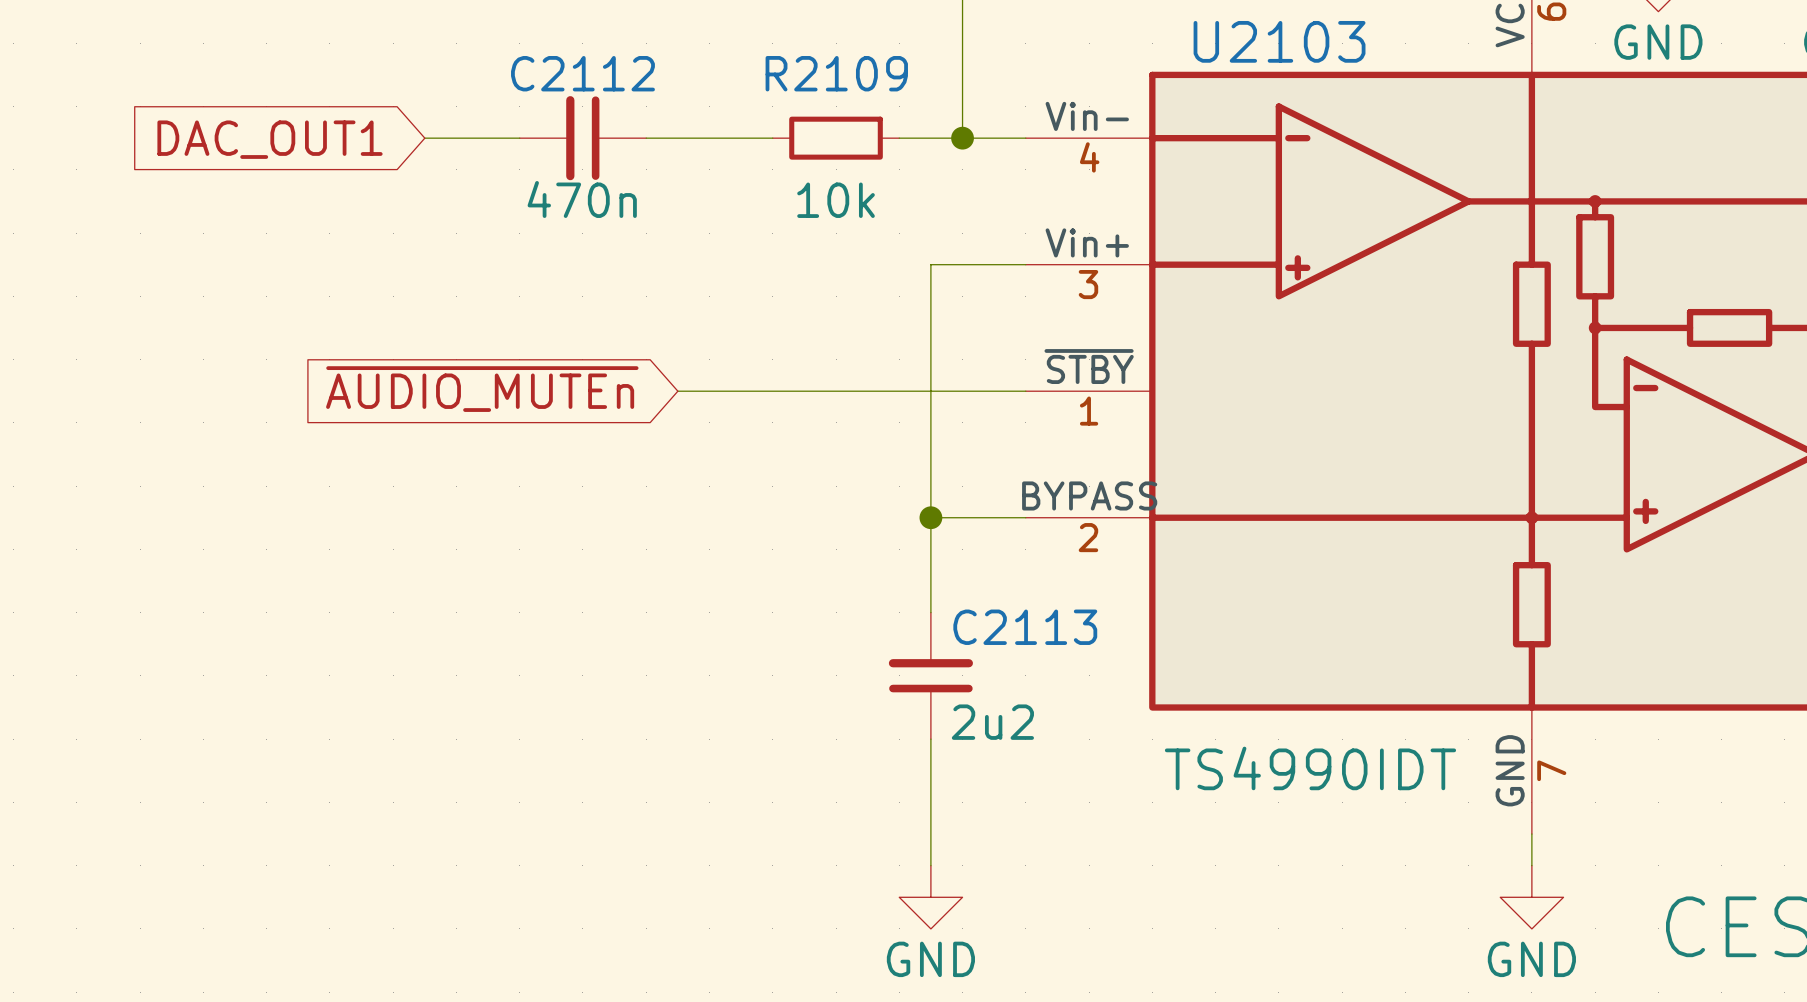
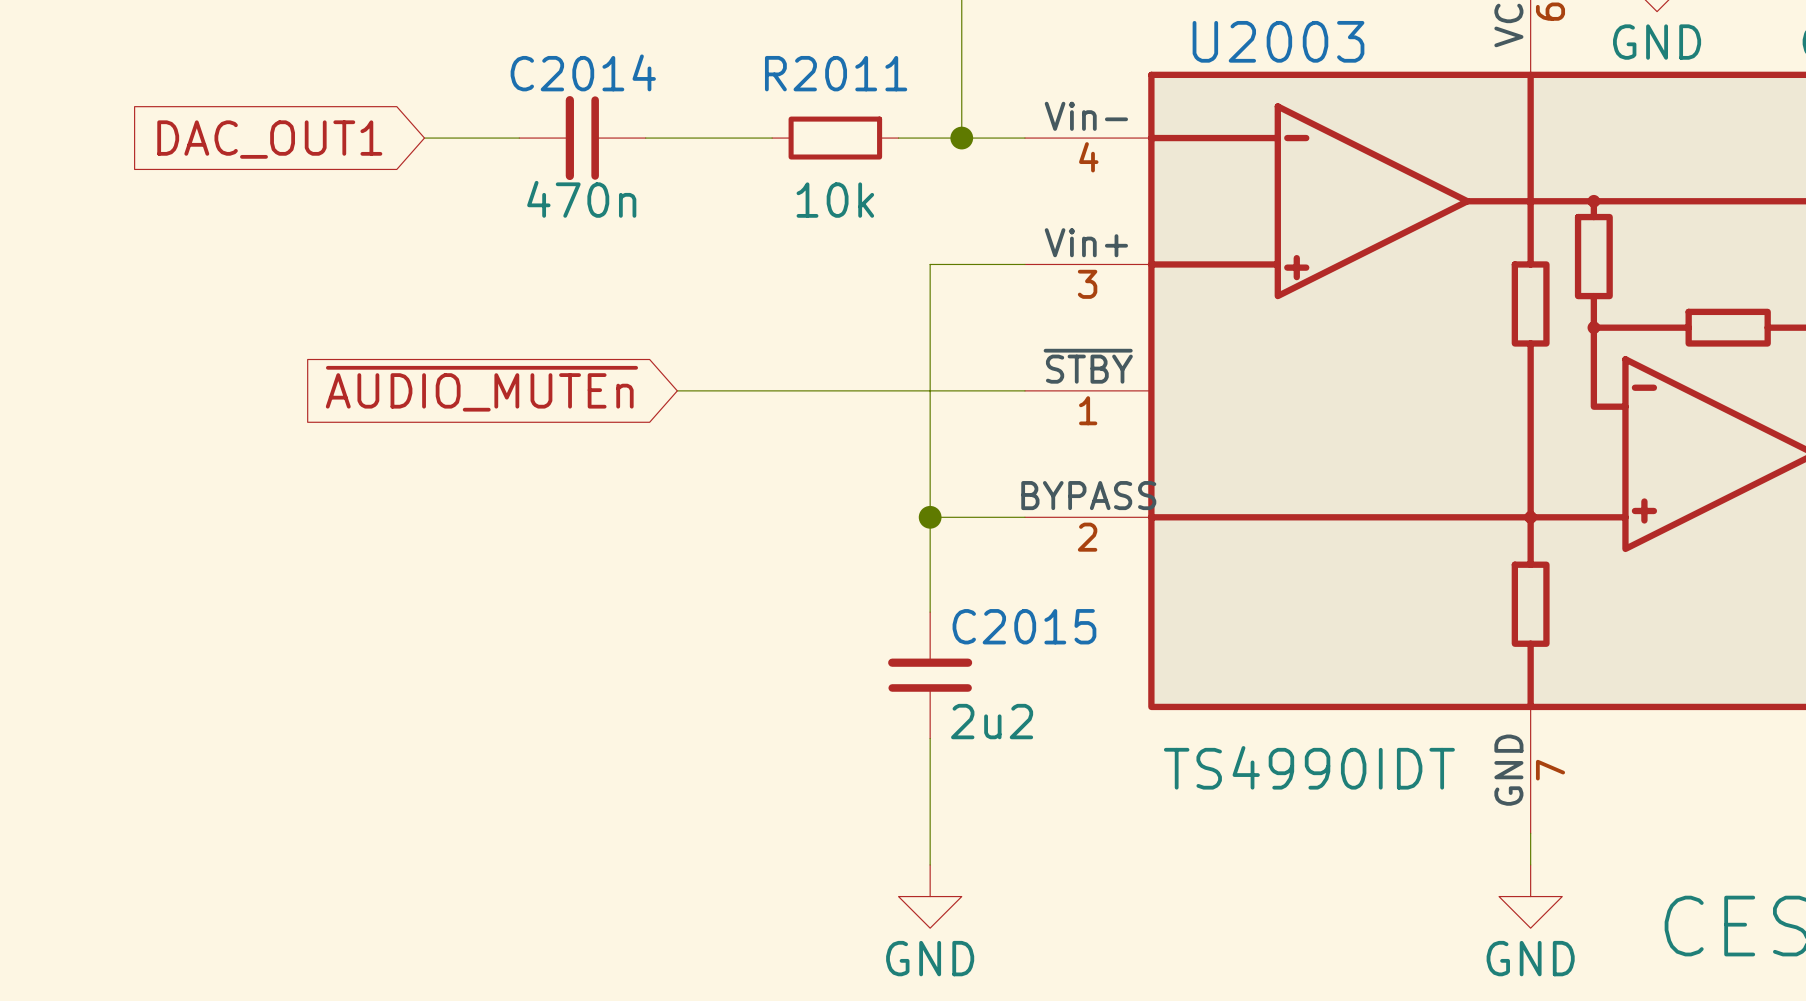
U2103 name: U2103 (1279, 41) -> U2003 (1278, 41)
C2112 name: C2112 (582, 73) -> C2014 (583, 72)
R2109 name: R2109 (836, 73) -> R2011 (836, 73)
C2113 name: C2113 (1025, 627) -> C2015 (1024, 626)

